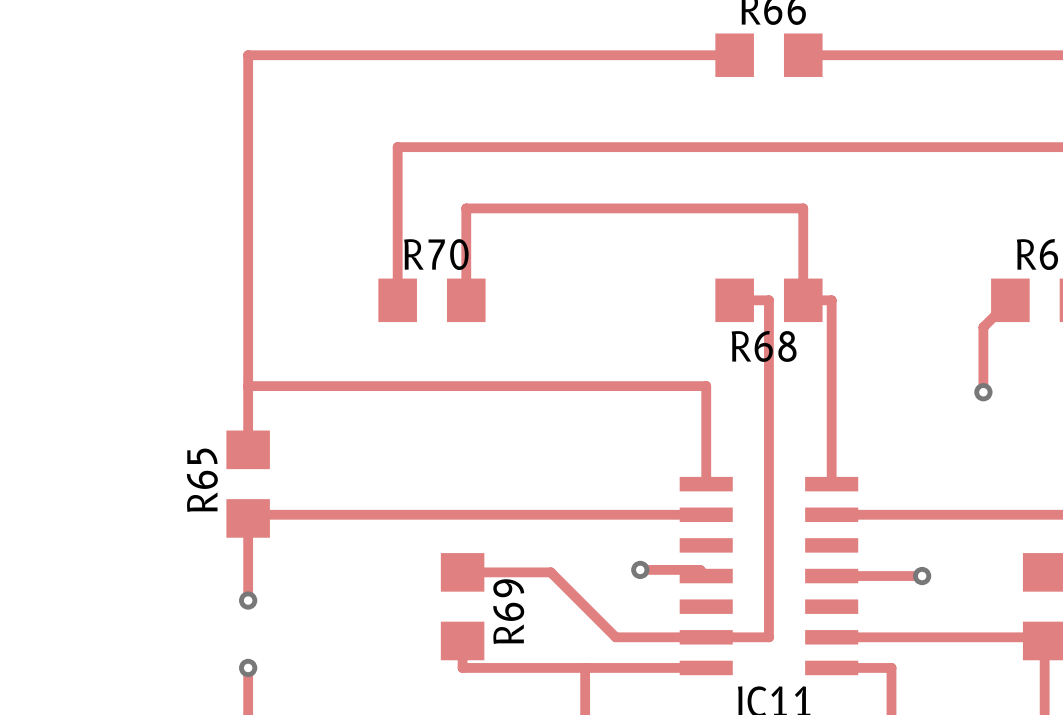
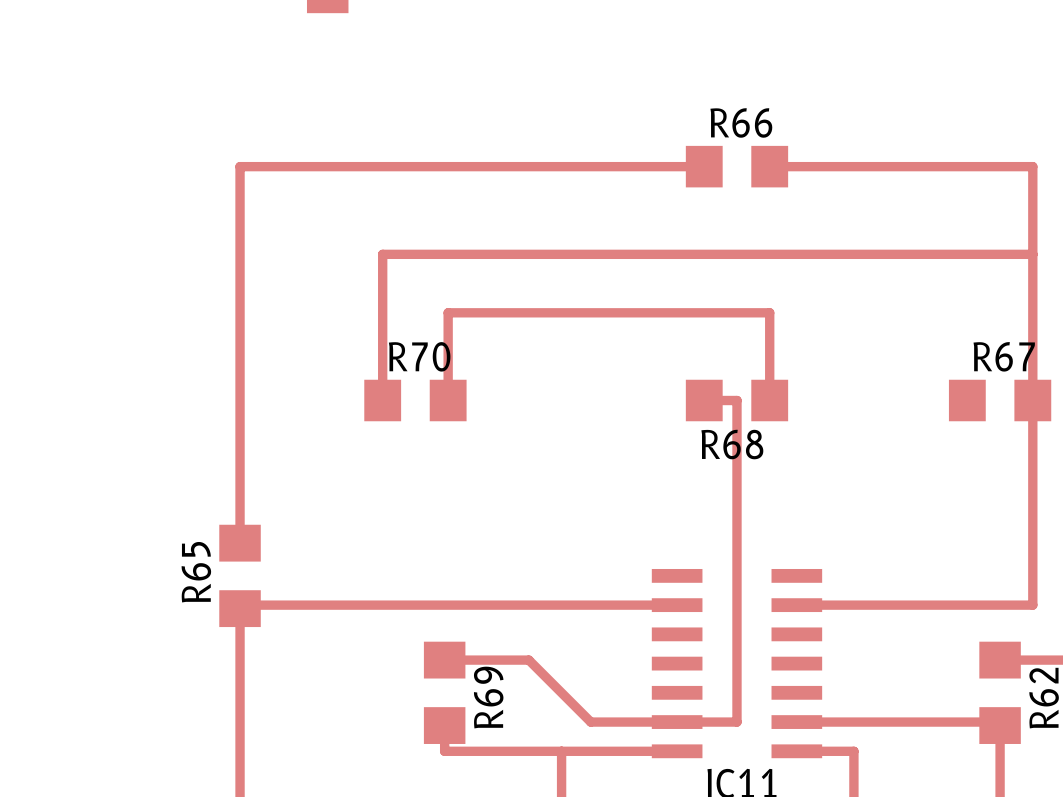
track: (803, 300) (831, 300) (831, 484) -> none
track: (1010, 300) (983, 327) (983, 392) -> none
track: (248, 386) (706, 386) (706, 484) -> none
via: (983, 392) -> none
track: (640, 569) (700, 569) (706, 576) -> none
via: (640, 569) -> none
track: (831, 576) (922, 576) -> none
via: (922, 576) -> none
track: none -> (240, 686) (240, 751)
via: (248, 600) -> none
via: (248, 667) -> none

